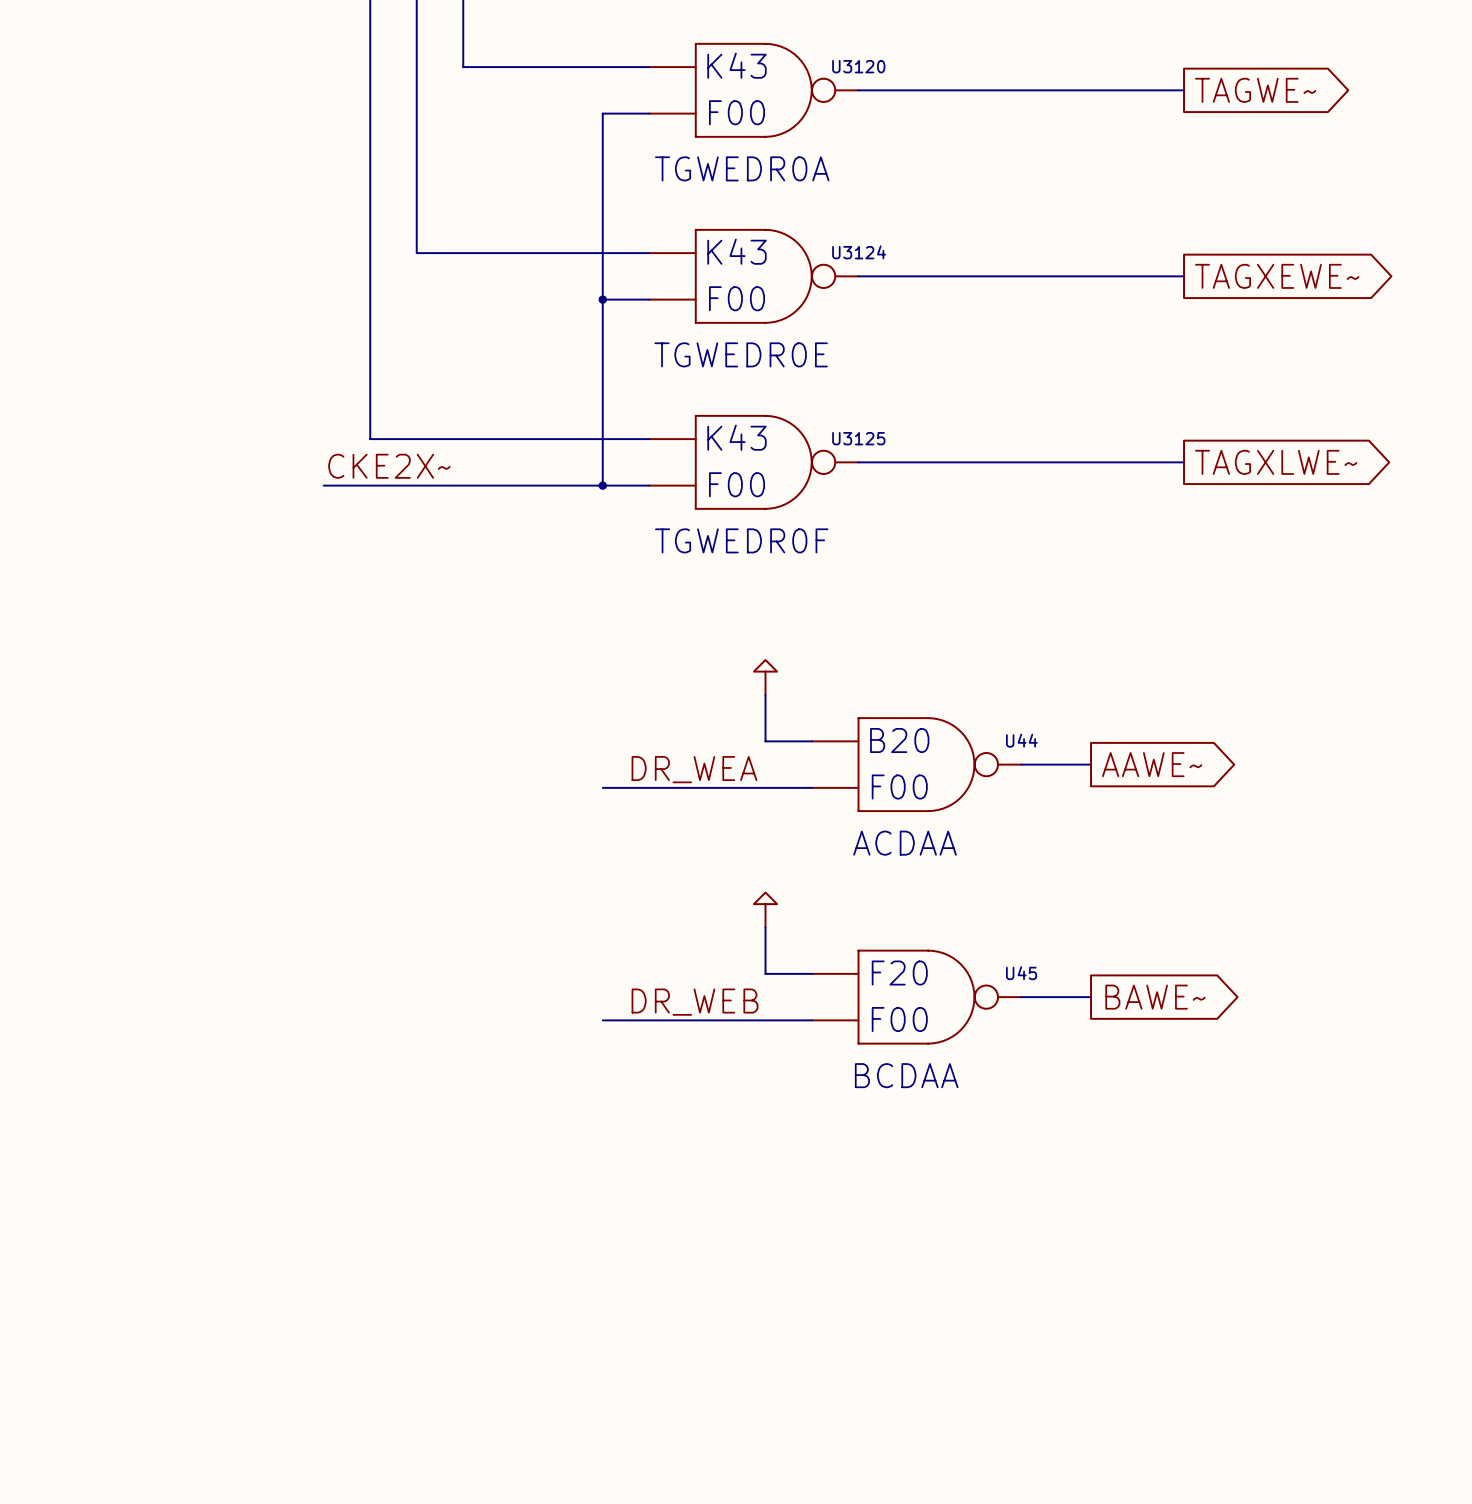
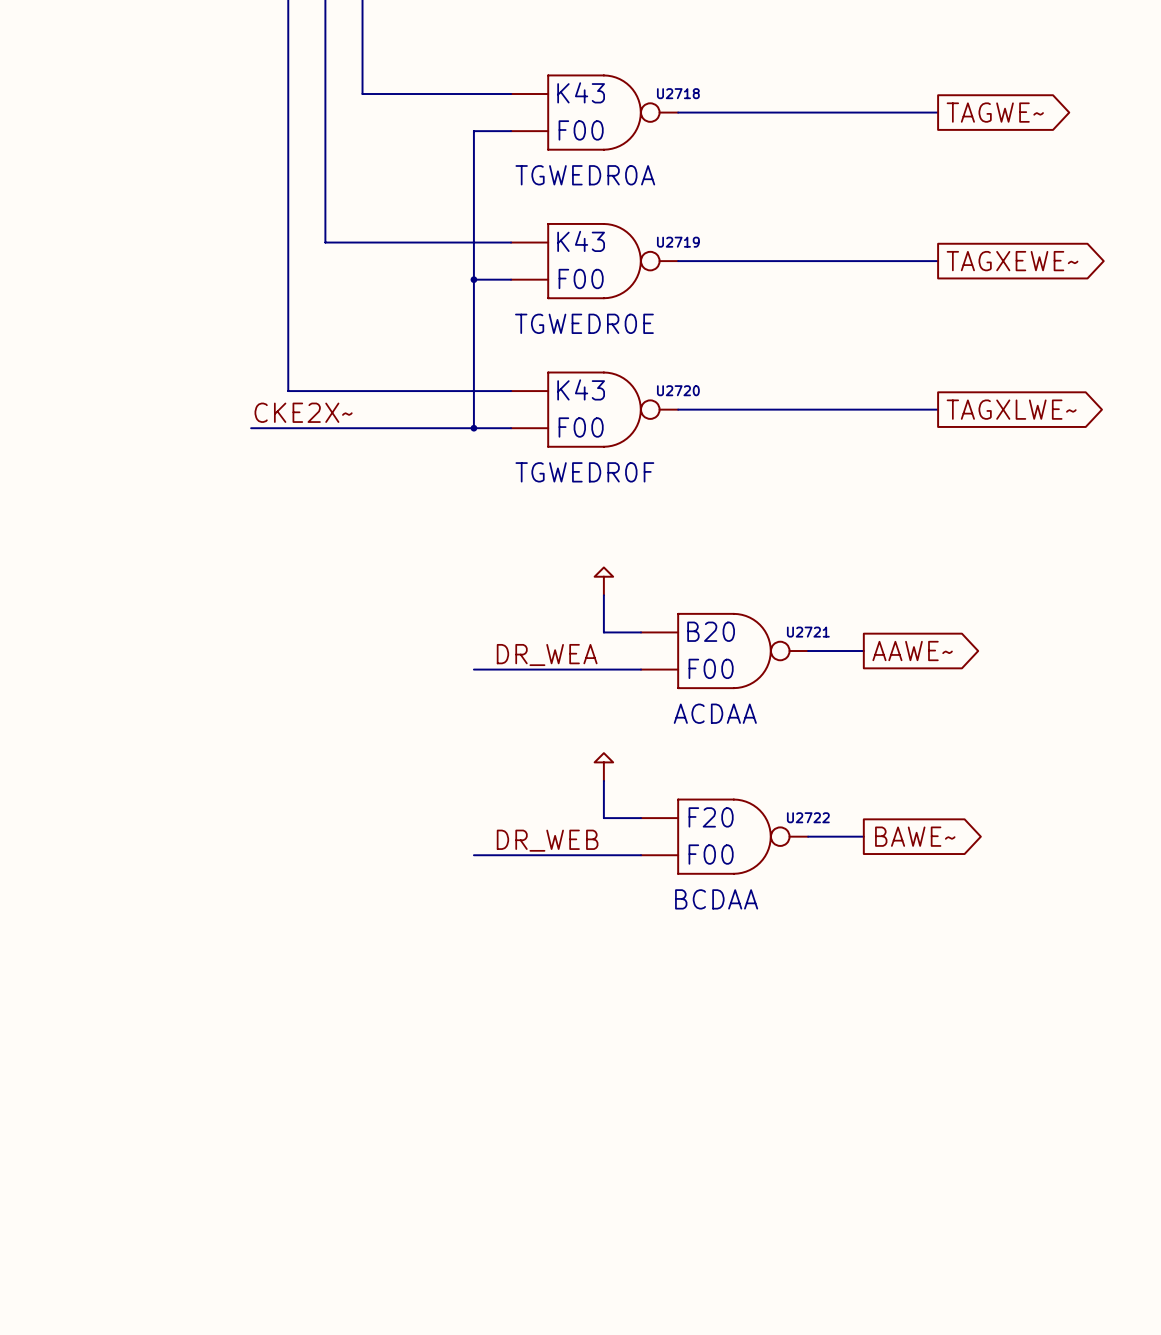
U3120 name: U3120 (858, 66) -> U2718 (678, 93)
U3124 name: U3124 (859, 252) -> U2719 (678, 242)
U3125 name: U3125 (858, 438) -> U2720 (678, 390)
U44 name: U44 (1021, 740) -> U2721 (808, 632)
U45 name: U45 (1021, 973) -> U2722 (808, 817)

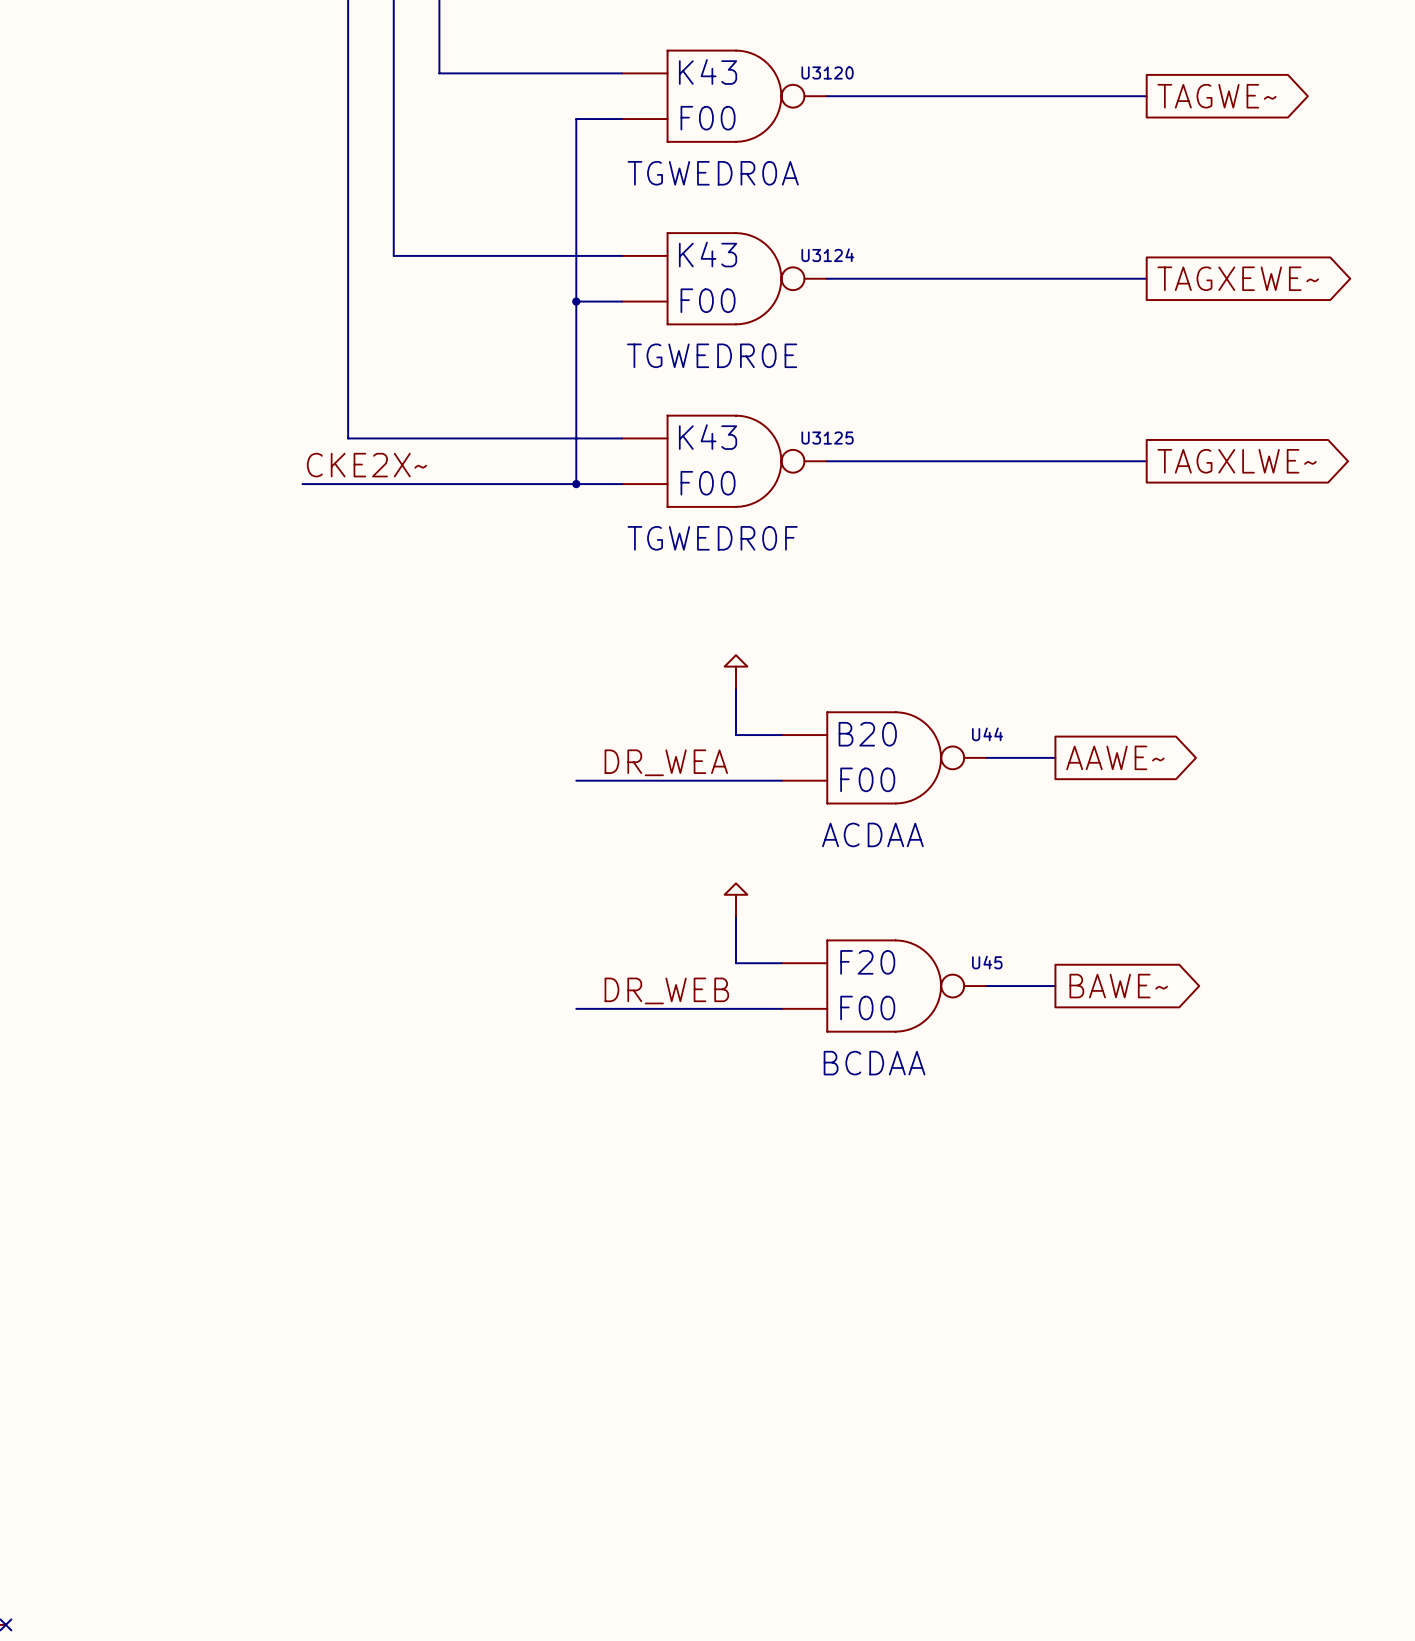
U2718 name: U2718 (678, 93) -> U3120 (827, 72)
U2719 name: U2719 (678, 242) -> U3124 (827, 255)
U2720 name: U2720 (678, 390) -> U3125 (827, 438)
U2721 name: U2721 (808, 632) -> U44 (987, 734)
U2722 name: U2722 (808, 817) -> U45 (987, 962)

